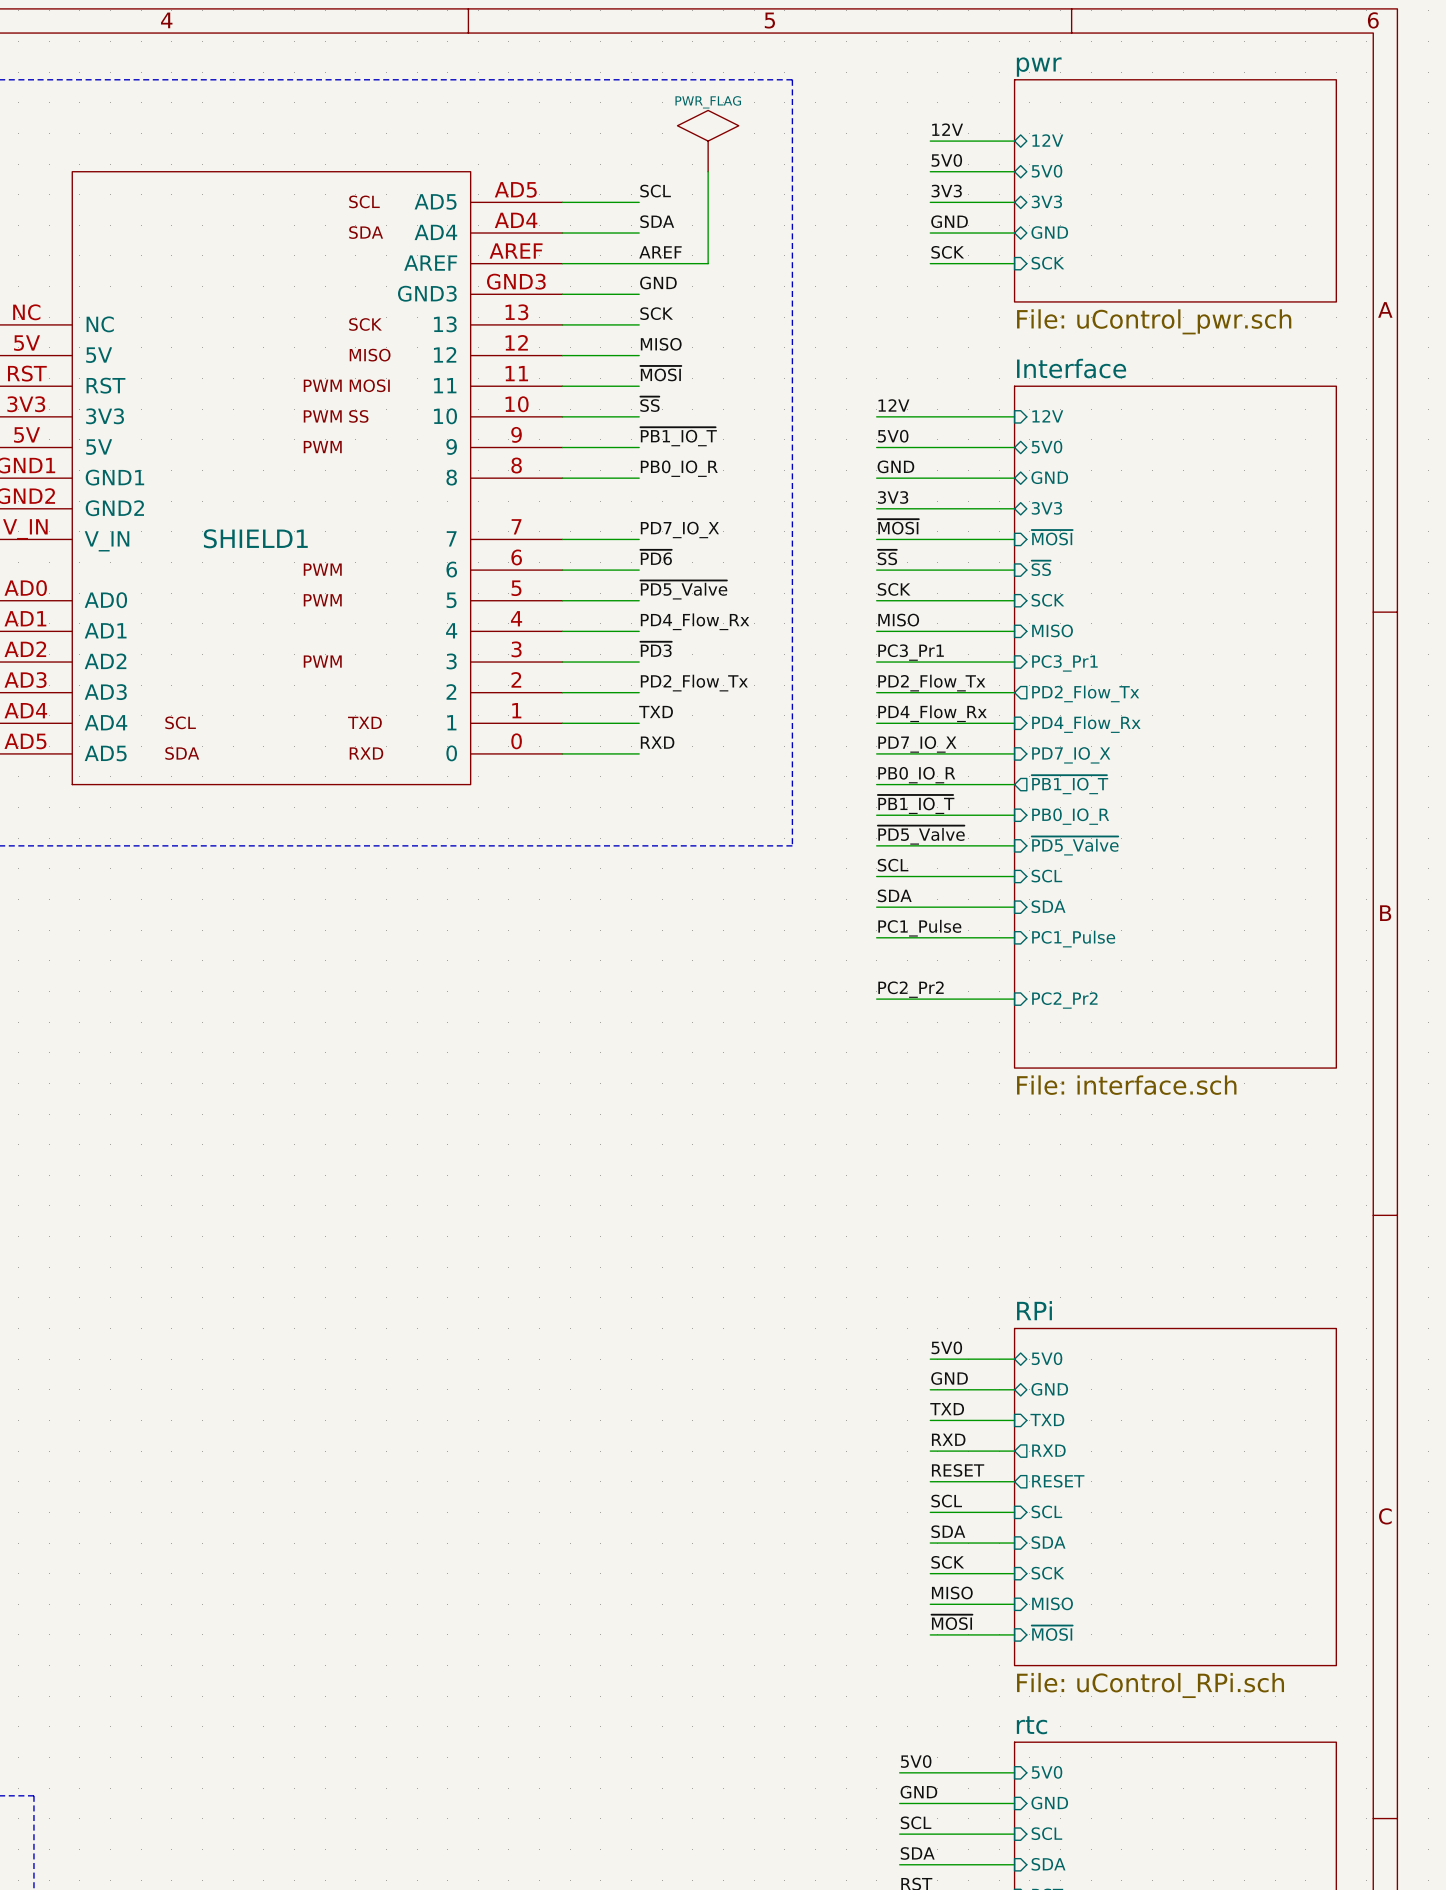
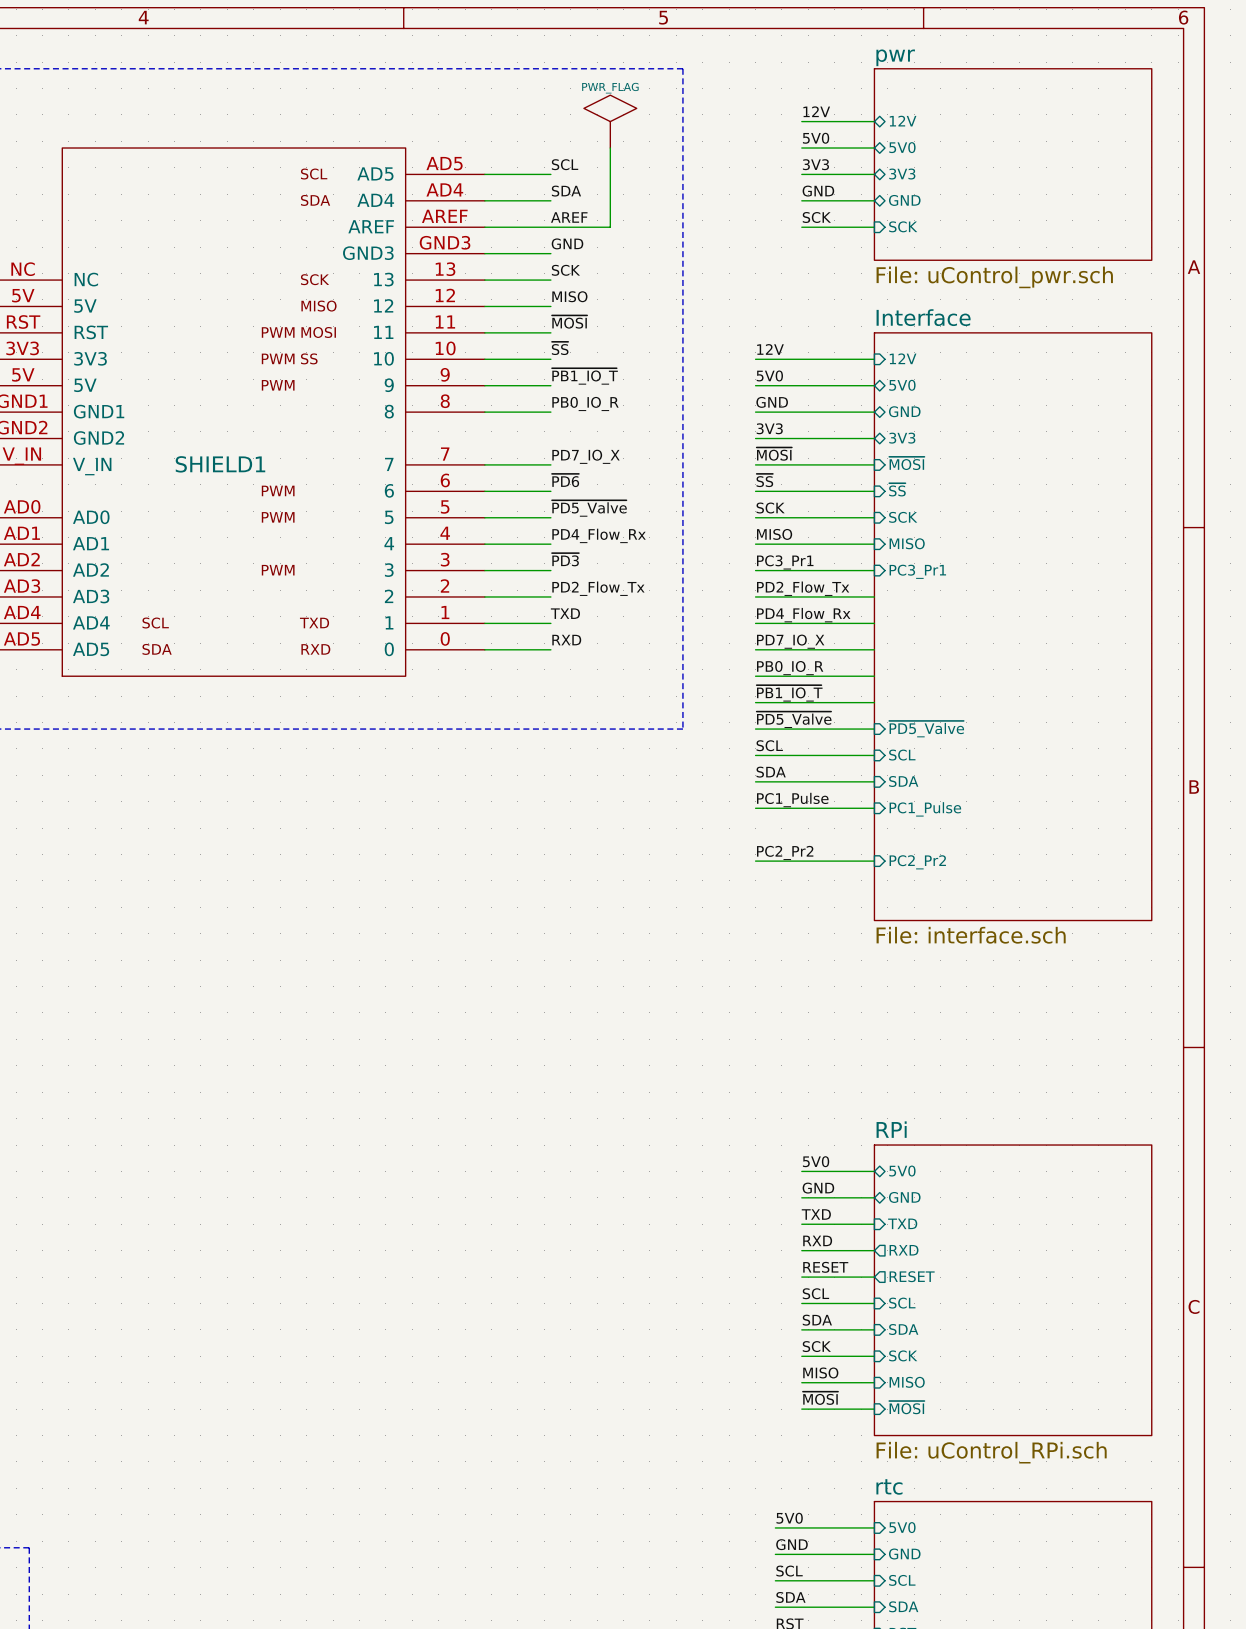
sheet pin: PD2_Flow_Tx (1085, 693) -> none
sheet pin: PD4_Flow_Rx (1086, 724) -> none
sheet pin: PD7_IO_X (1071, 755) -> none
sheet pin: ~{PB1_IO_T} (1069, 784) -> none
sheet pin: PB0_IO_R (1070, 816) -> none

